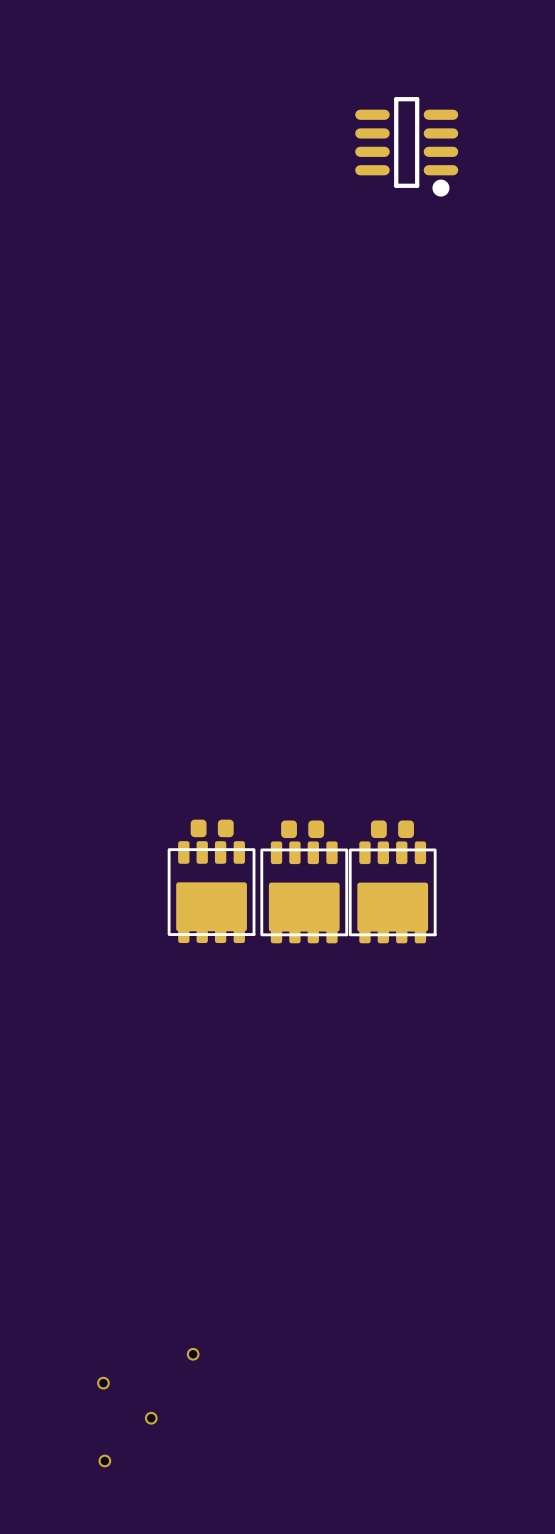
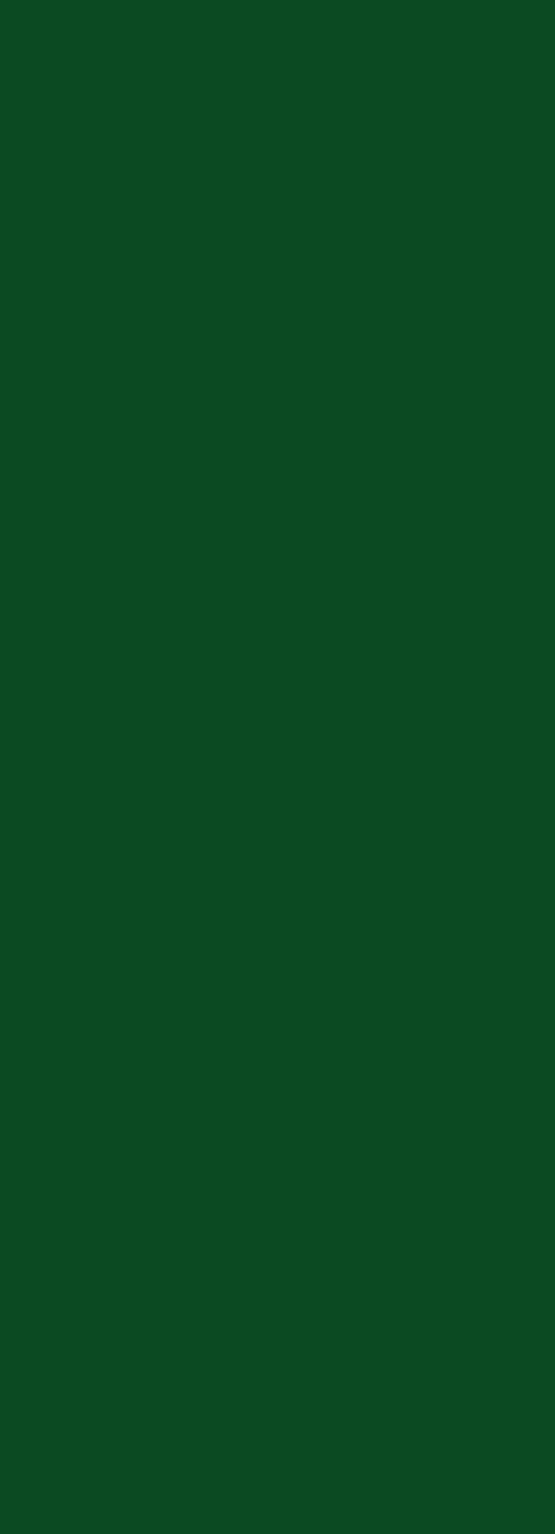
part: (406, 146) -> none
part: (212, 828) -> none
part: (302, 829) -> none
part: (392, 829) -> none
part: (211, 892) -> none
part: (304, 892) -> none
part: (392, 892) -> none
via: (193, 1354) -> none
via: (103, 1383) -> none
via: (151, 1418) -> none
via: (104, 1460) -> none

